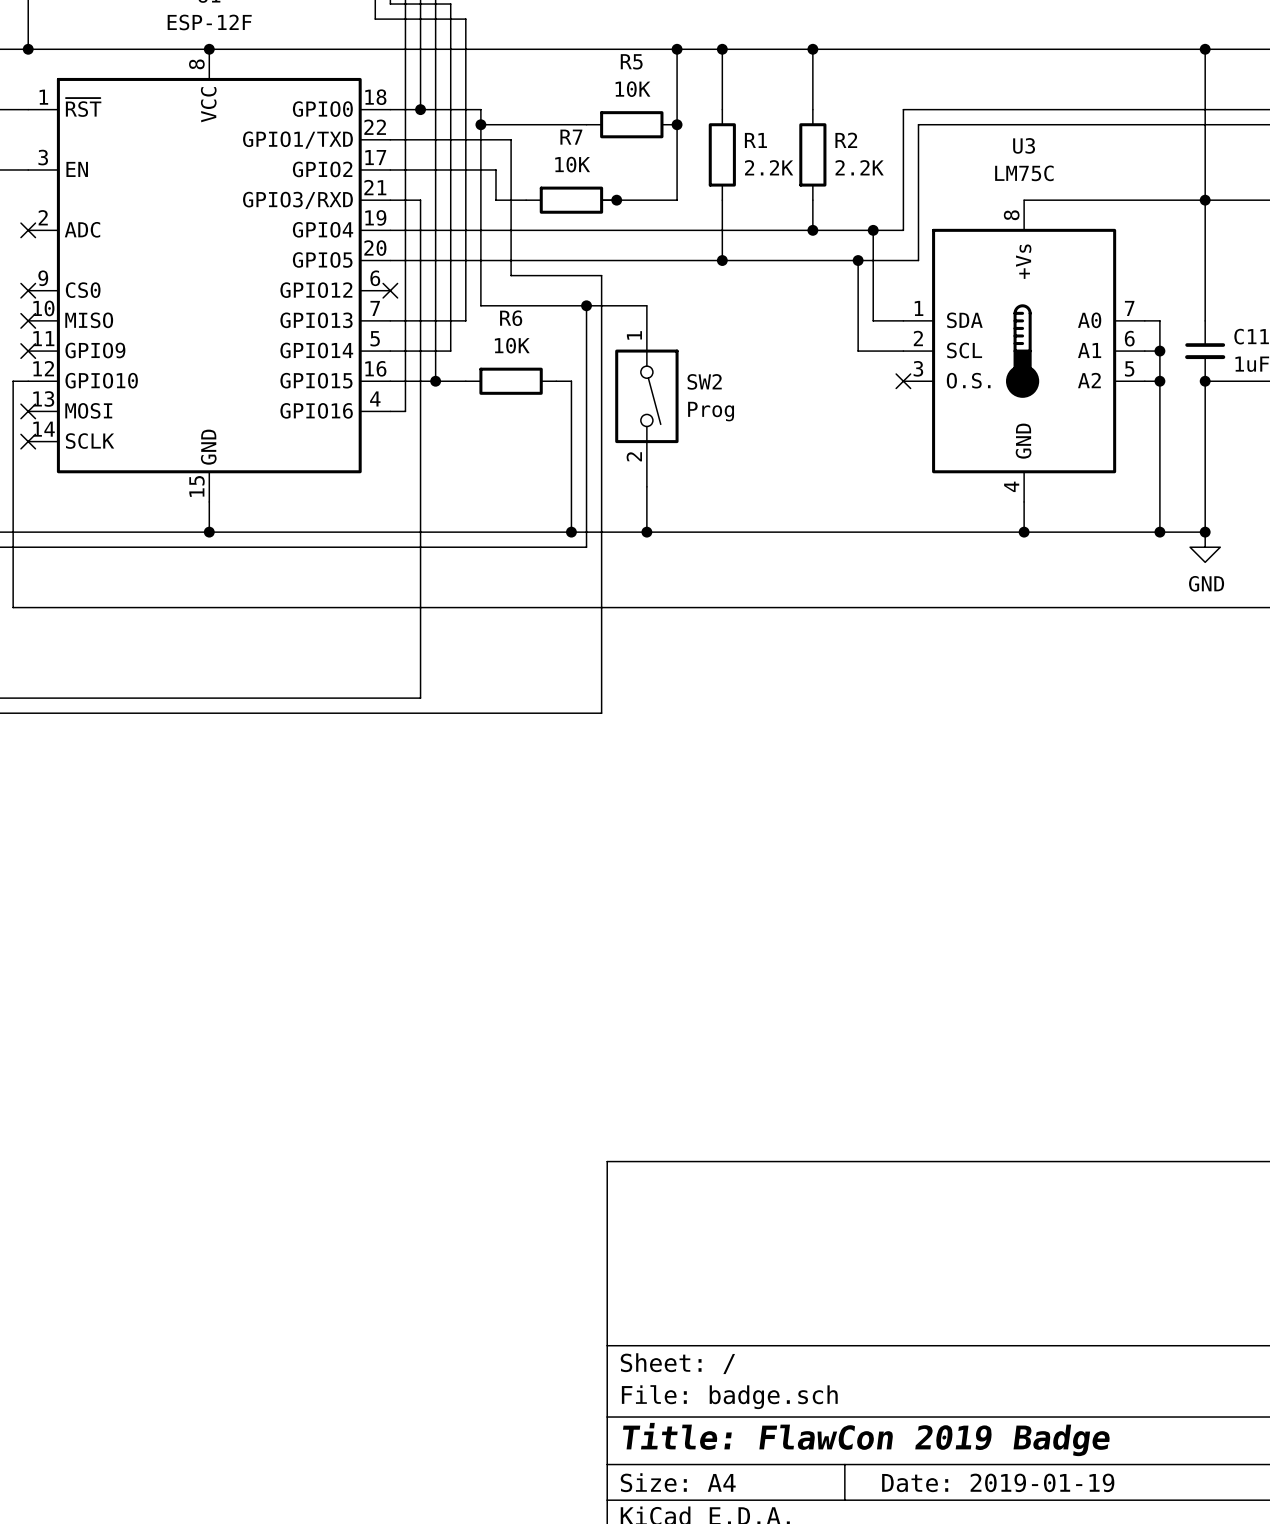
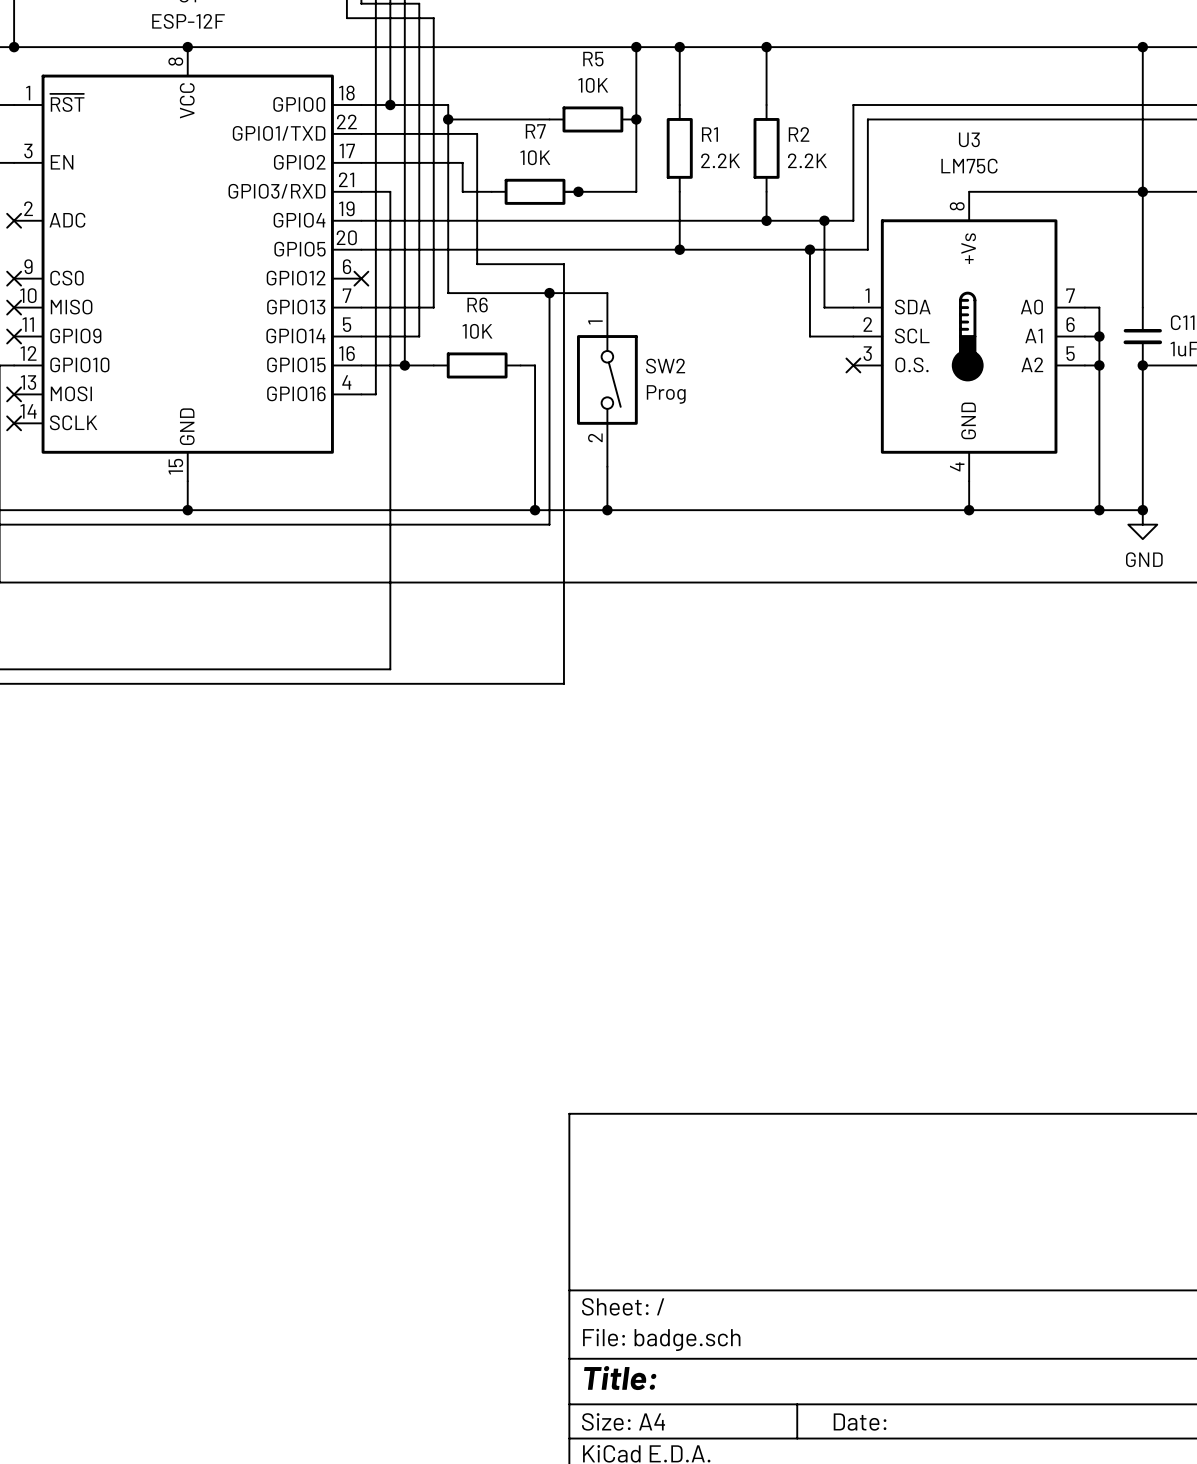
title block: Title: FlawCon 2019 Badge (866, 1439) -> Title: (620, 1378)
title block: Date: 2019-01-19 (998, 1482) -> Date: (860, 1422)

